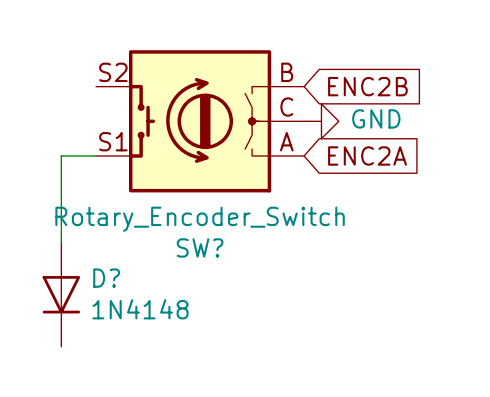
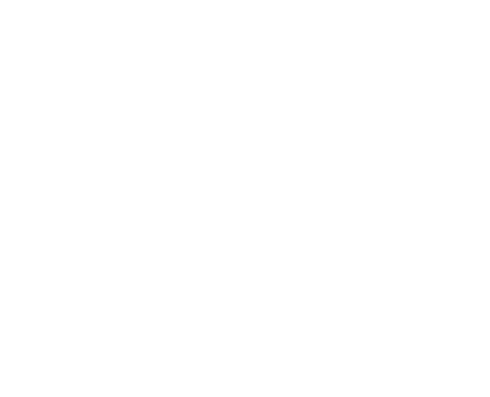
global label: ENC2B (367, 86) -> none
SW?: Rotary_Encoder_Switch (200, 121) -> none
power symbol: GND (321, 121) -> none
wire: (96, 155) (61, 155) (61, 242) -> none
global label: ENC2A (367, 155) -> none
D?: 1N4148 (61, 294) -> none

